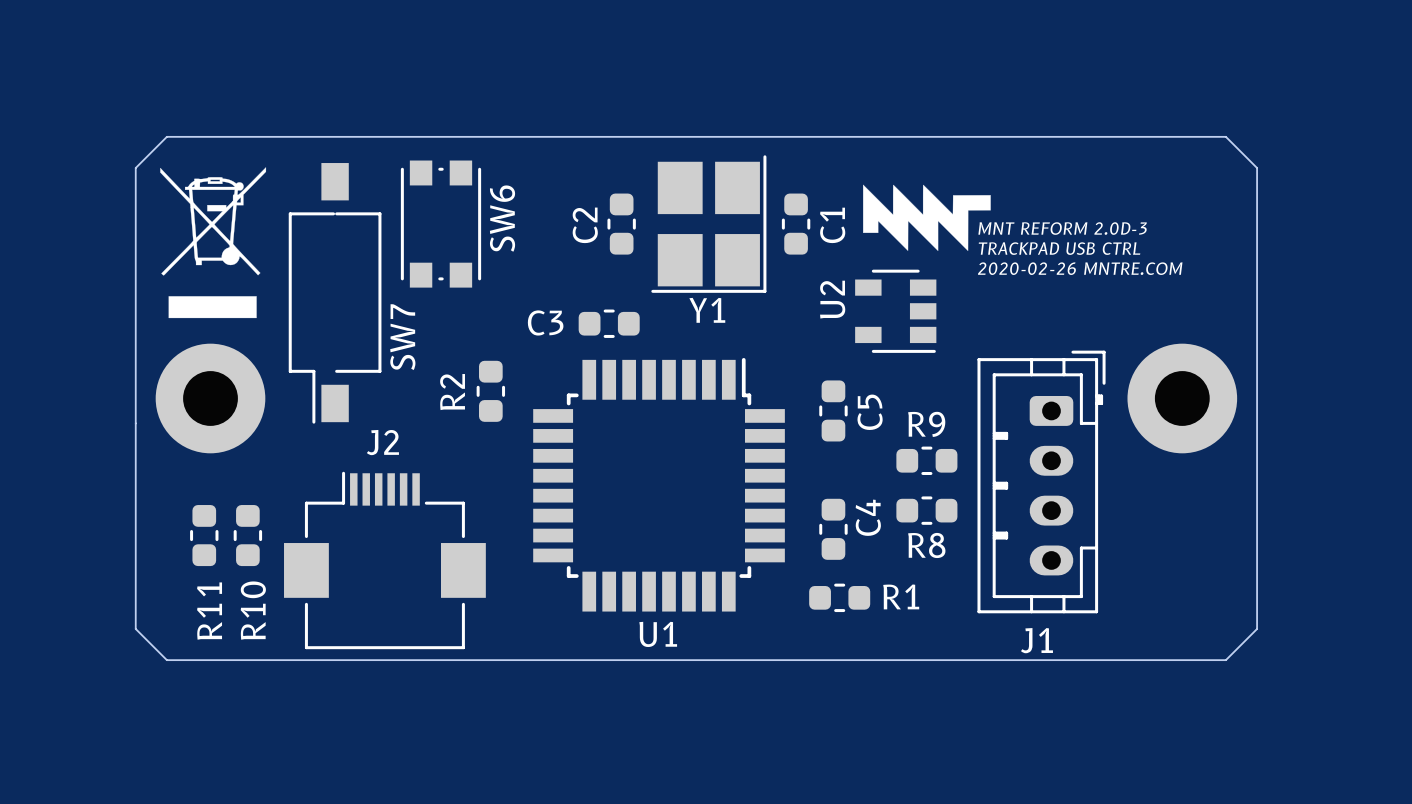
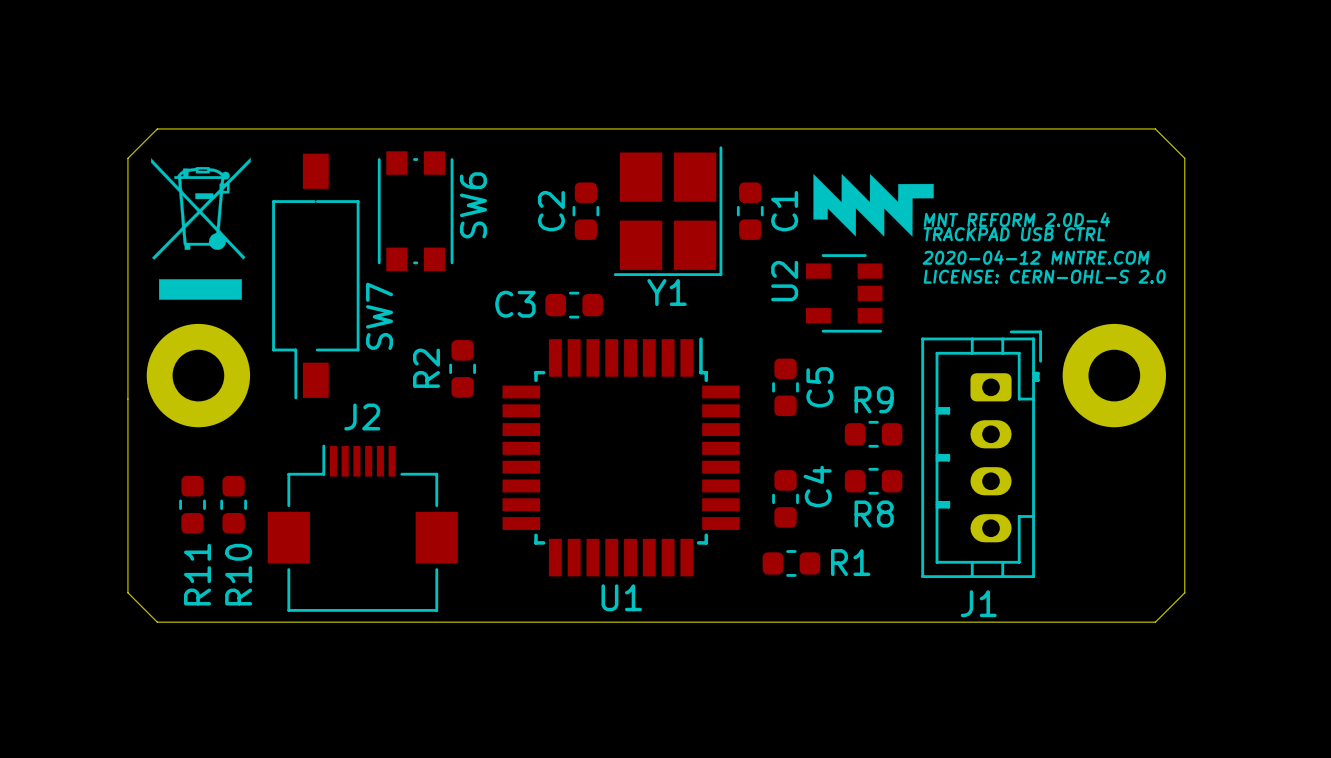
text: MNT REFORM 2.0D-3 (1062, 228) -> MNT REFORM 2.0D-4 (1016, 219)
text: 2020-02-26 MNTRE.COM (1080, 268) -> 2020-04-12 MNTRE.COM (1036, 257)
text: none -> LICENSE: CERN-OHL-S 2.0 (1044, 276)

